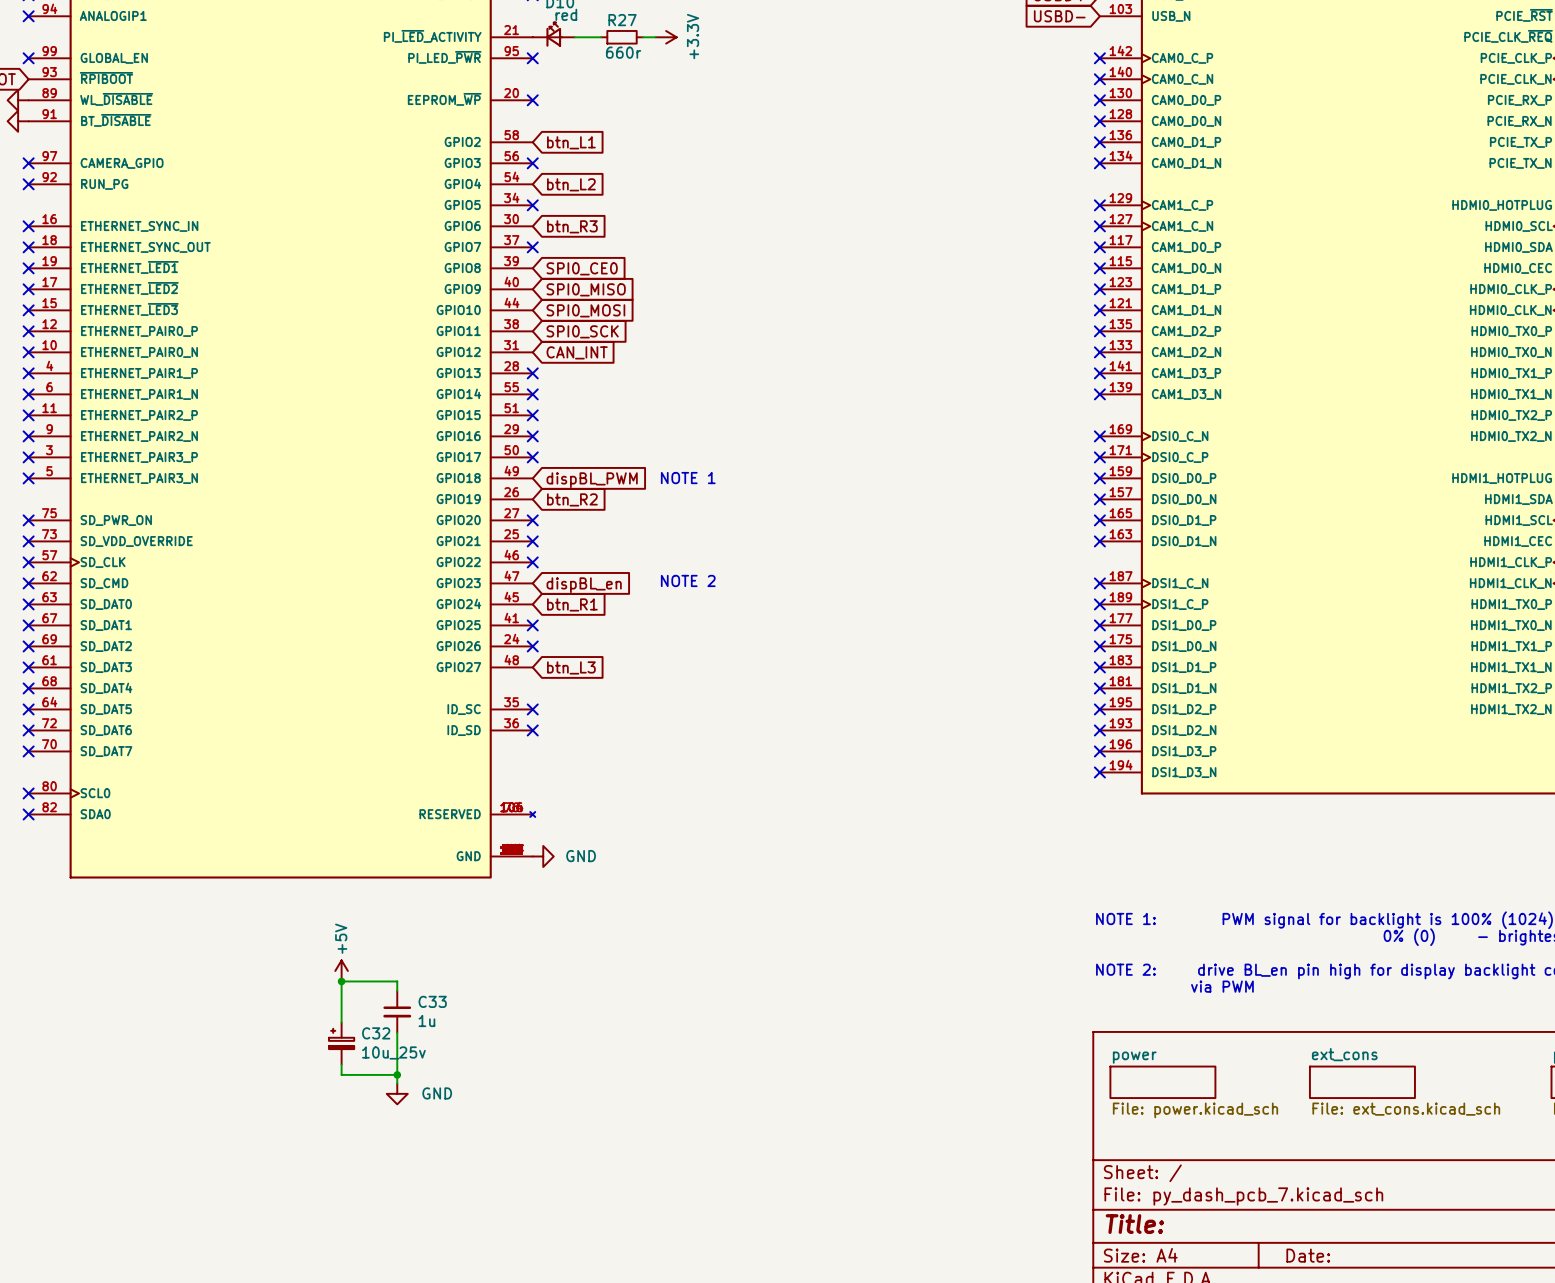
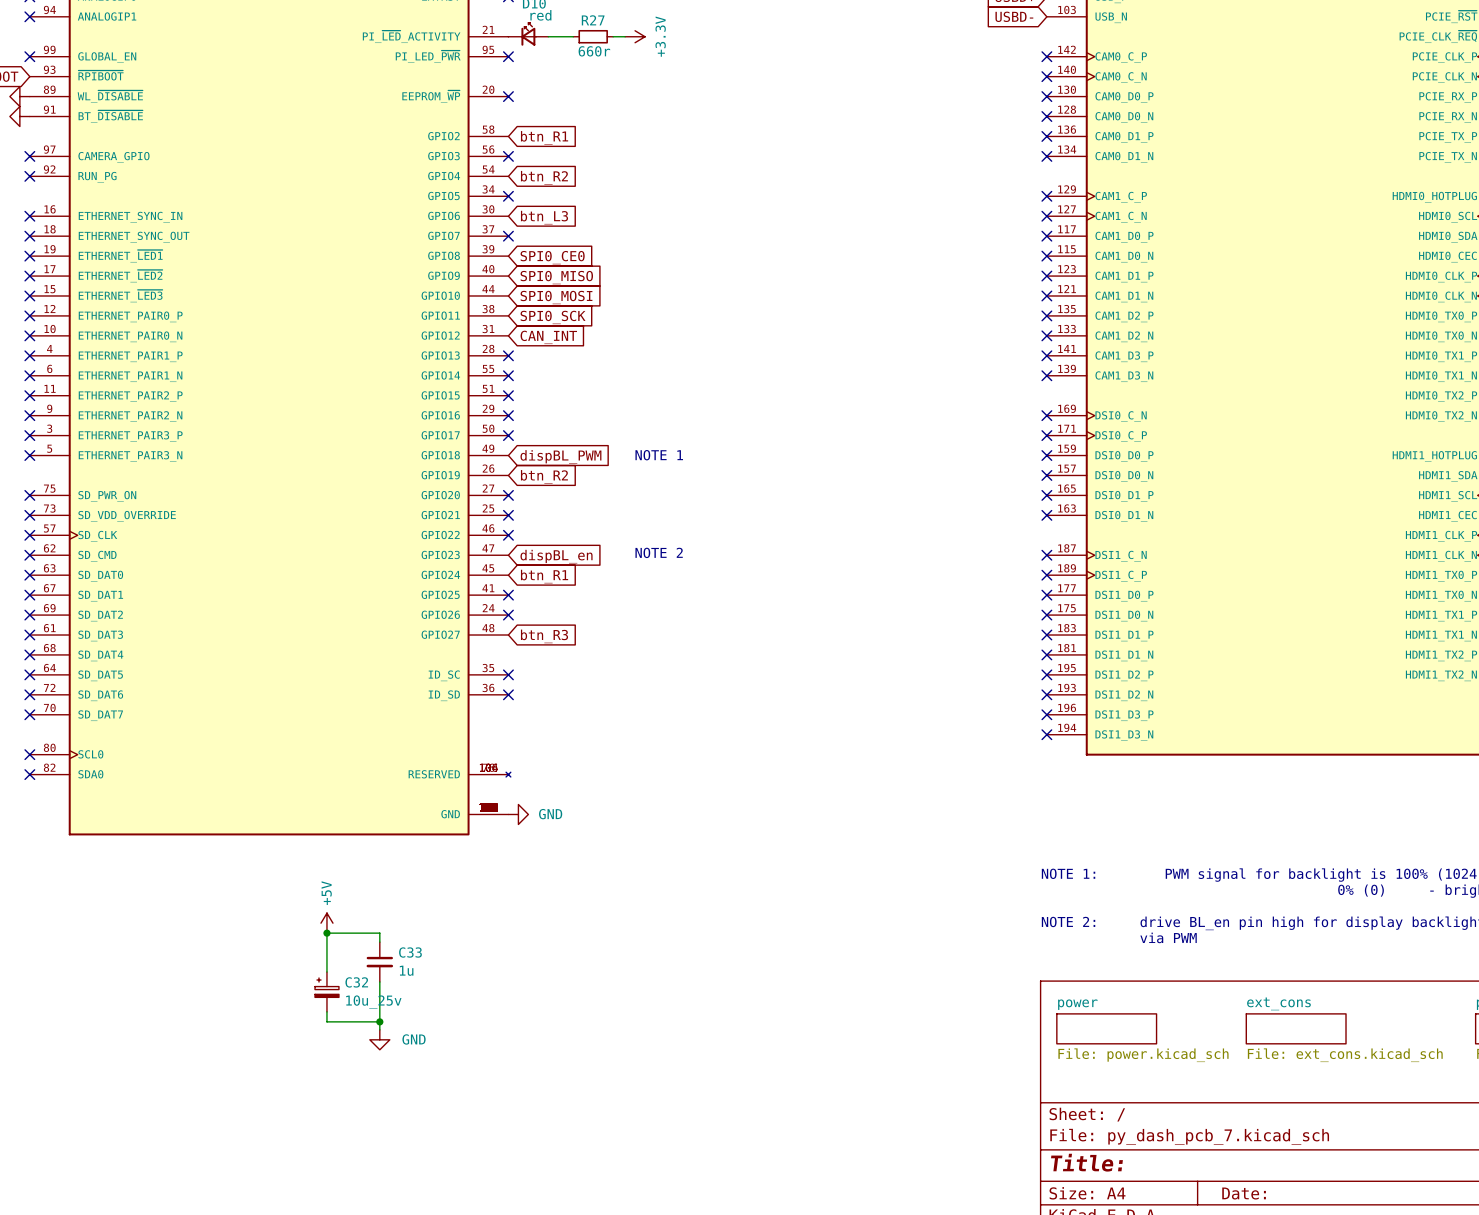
global label: btn_L1 (571, 142) -> btn_R1 (544, 137)
global label: btn_L2 (571, 184) -> btn_R2 (544, 177)
global label: btn_R3 (572, 226) -> btn_L3 (544, 217)
global label: btn_L3 (571, 667) -> btn_R3 (544, 636)

